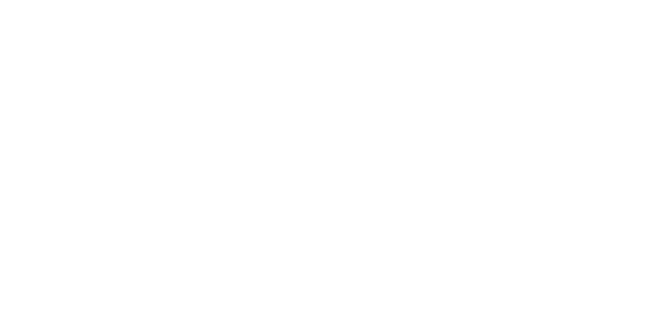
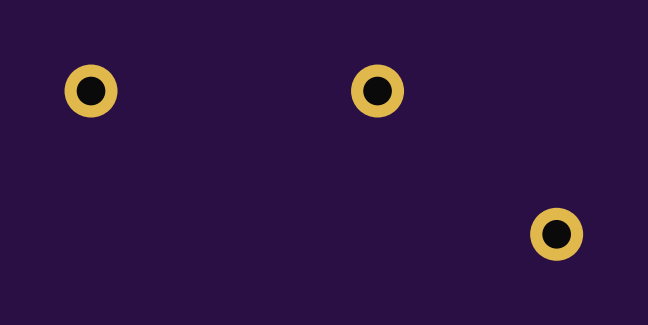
part: none -> (91, 91)
part: none -> (377, 91)
part: none -> (556, 234)

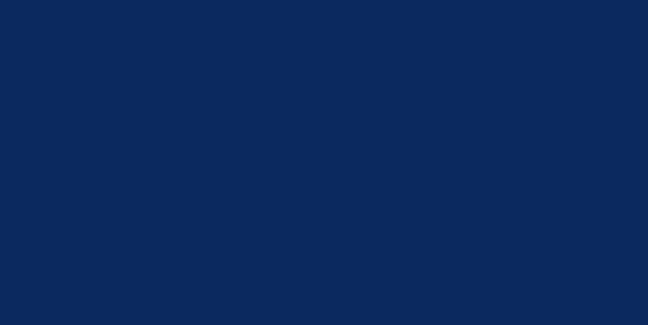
part: (91, 91) -> none
part: (377, 91) -> none
part: (556, 234) -> none

